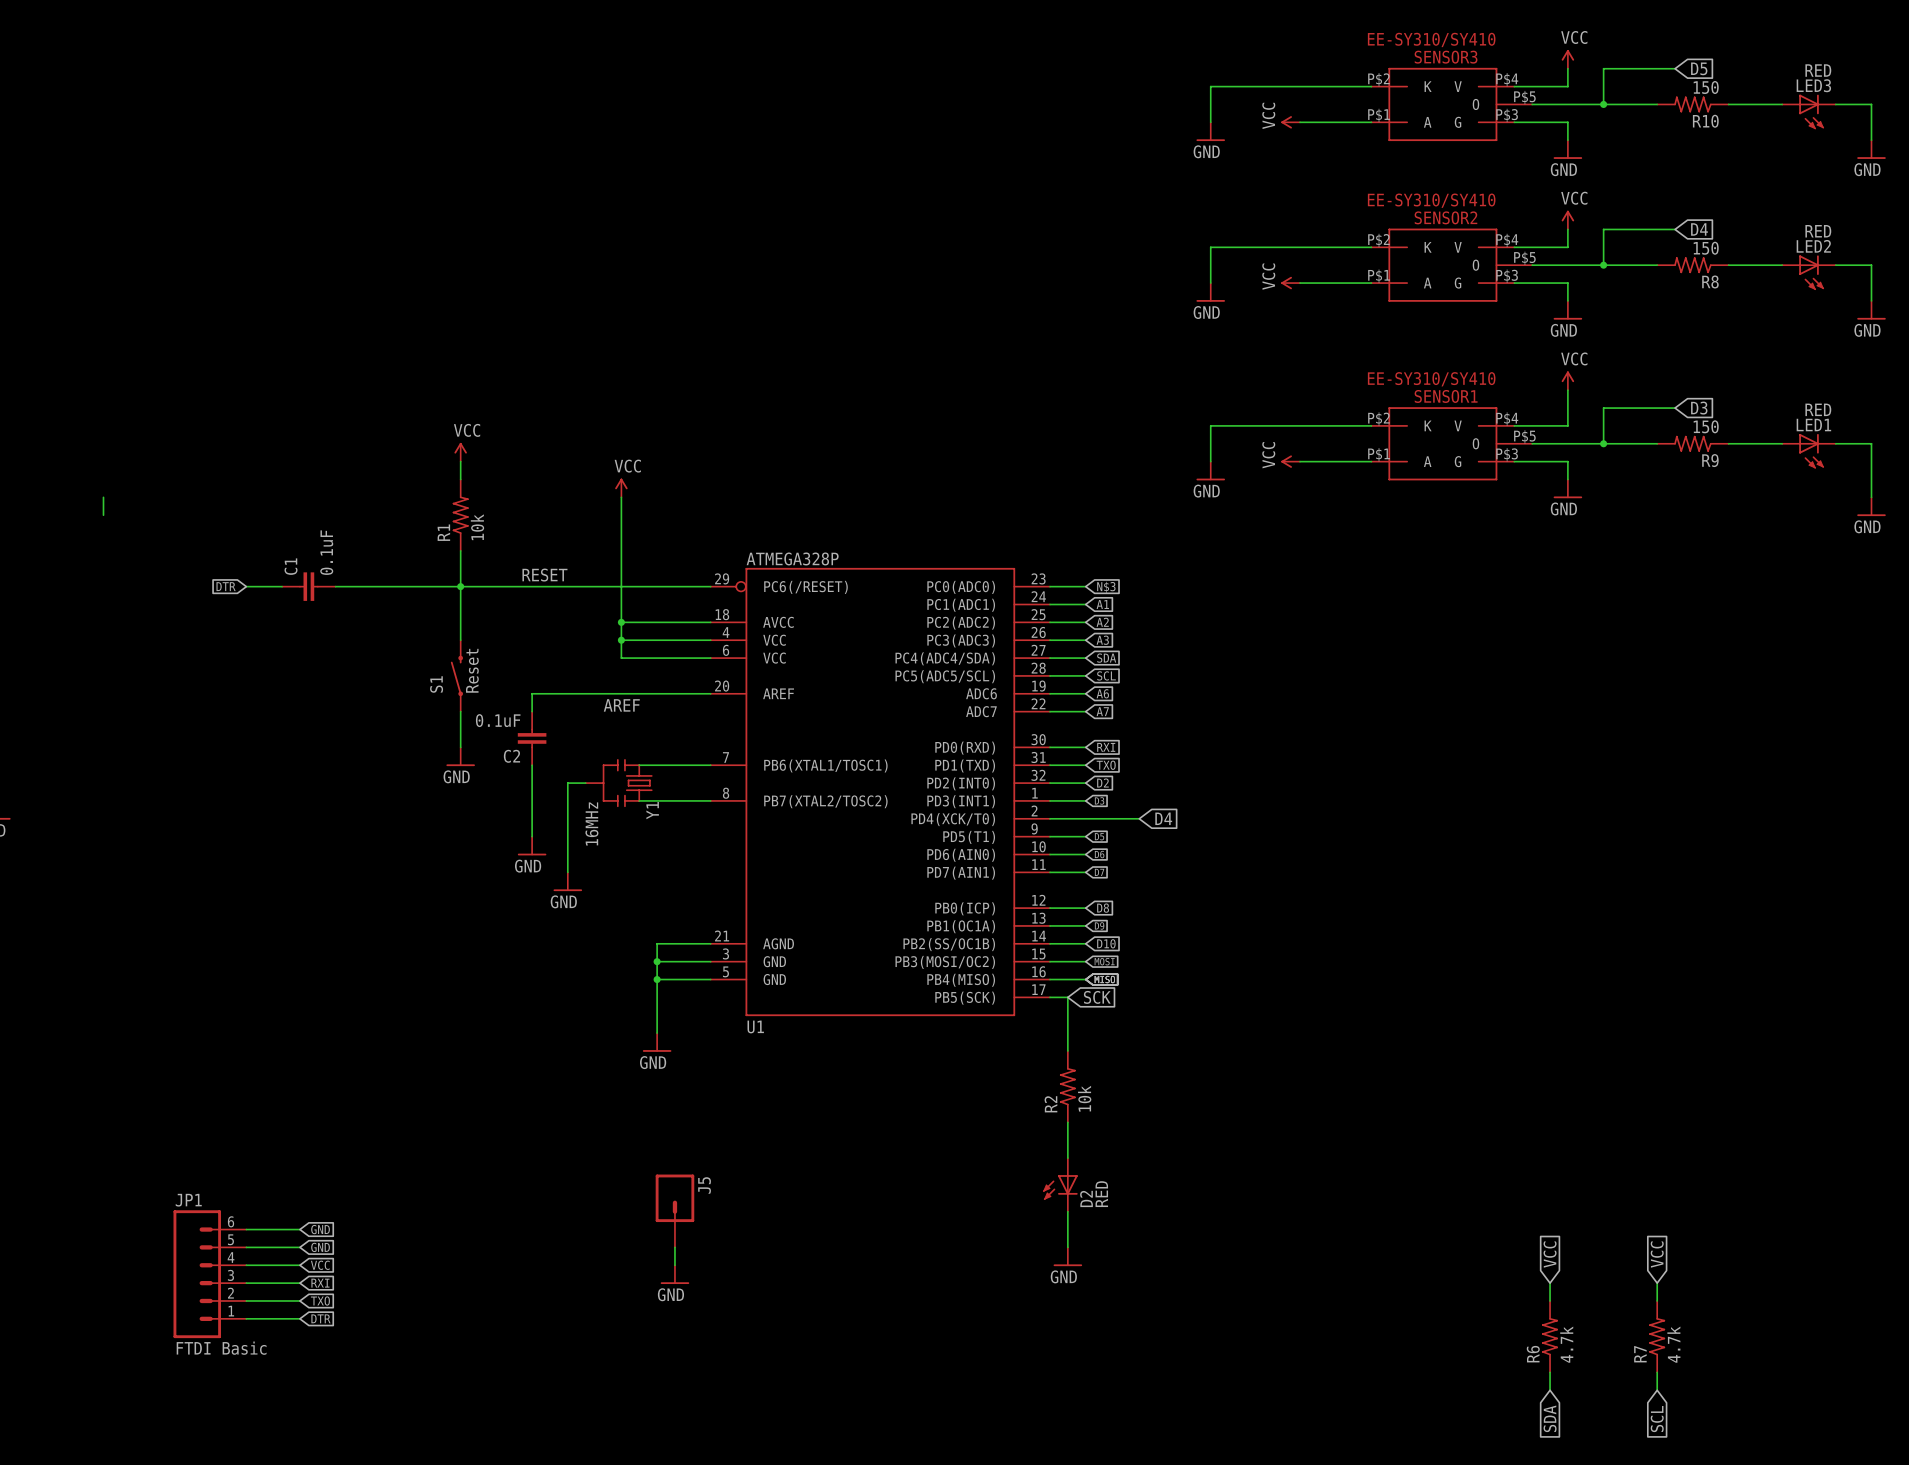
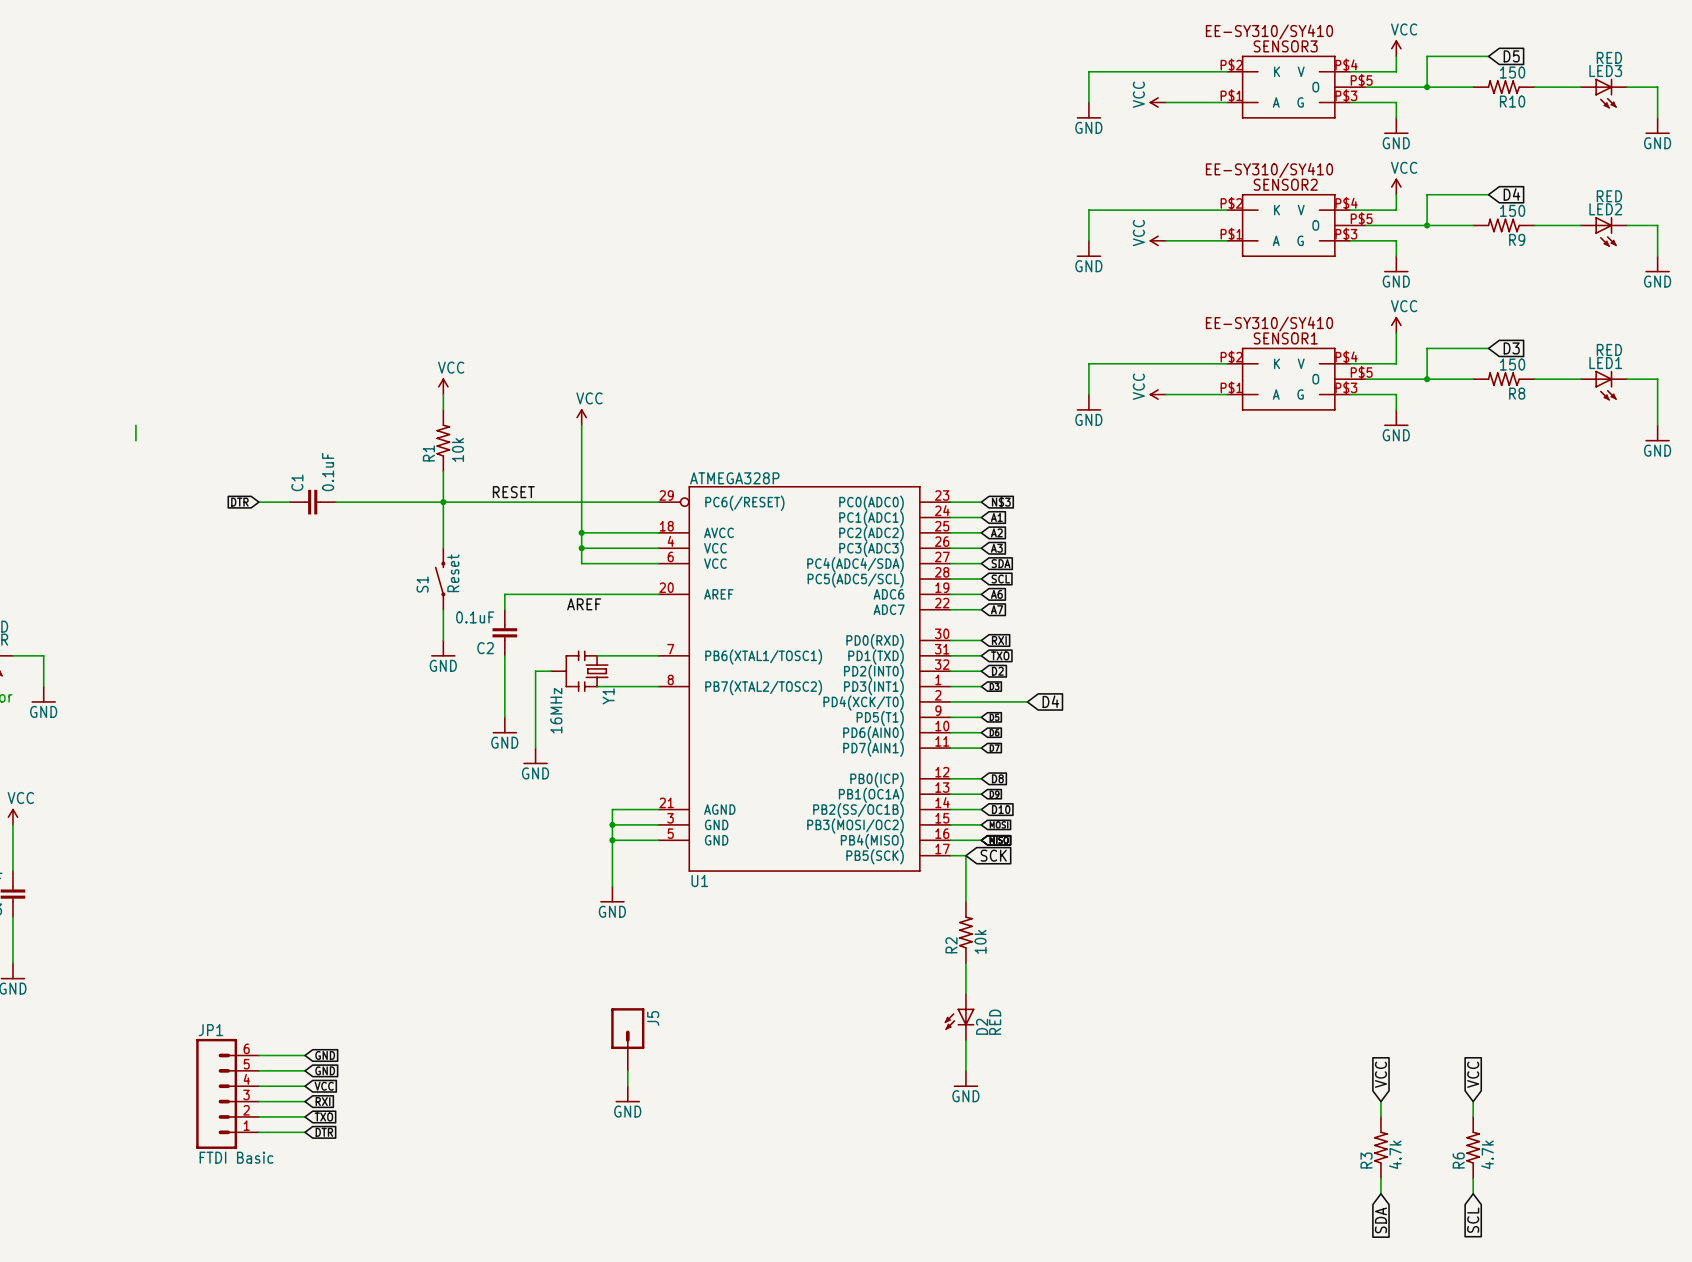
R8 name: R8 (1710, 281) -> R9 (1517, 239)
R9 name: R9 (1710, 460) -> R8 (1517, 393)
R6 name: R6 (1533, 1354) -> R3 (1366, 1160)
R7 name: R7 (1640, 1354) -> R6 (1458, 1160)

